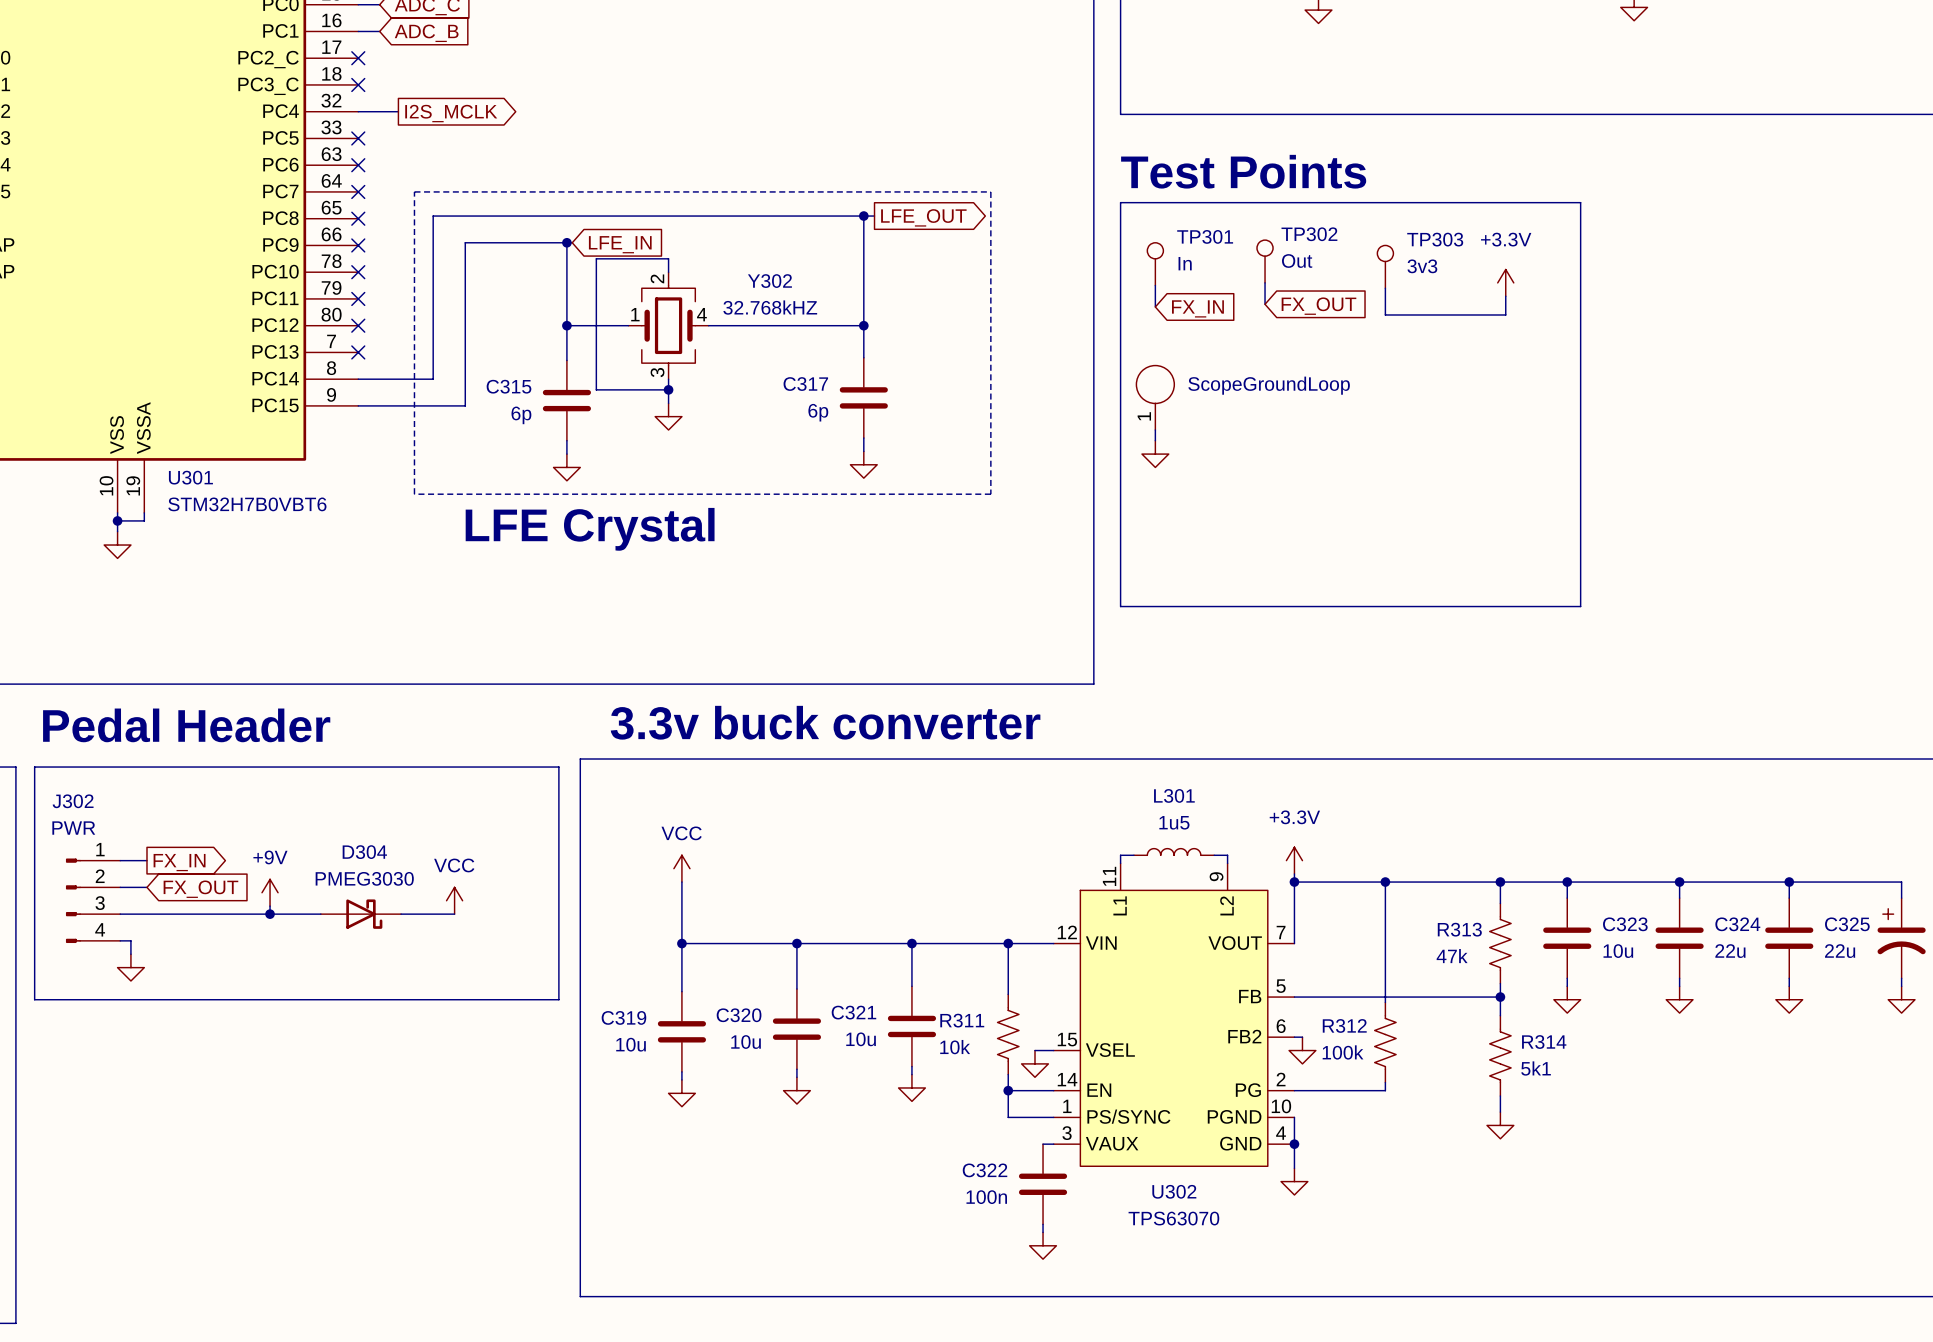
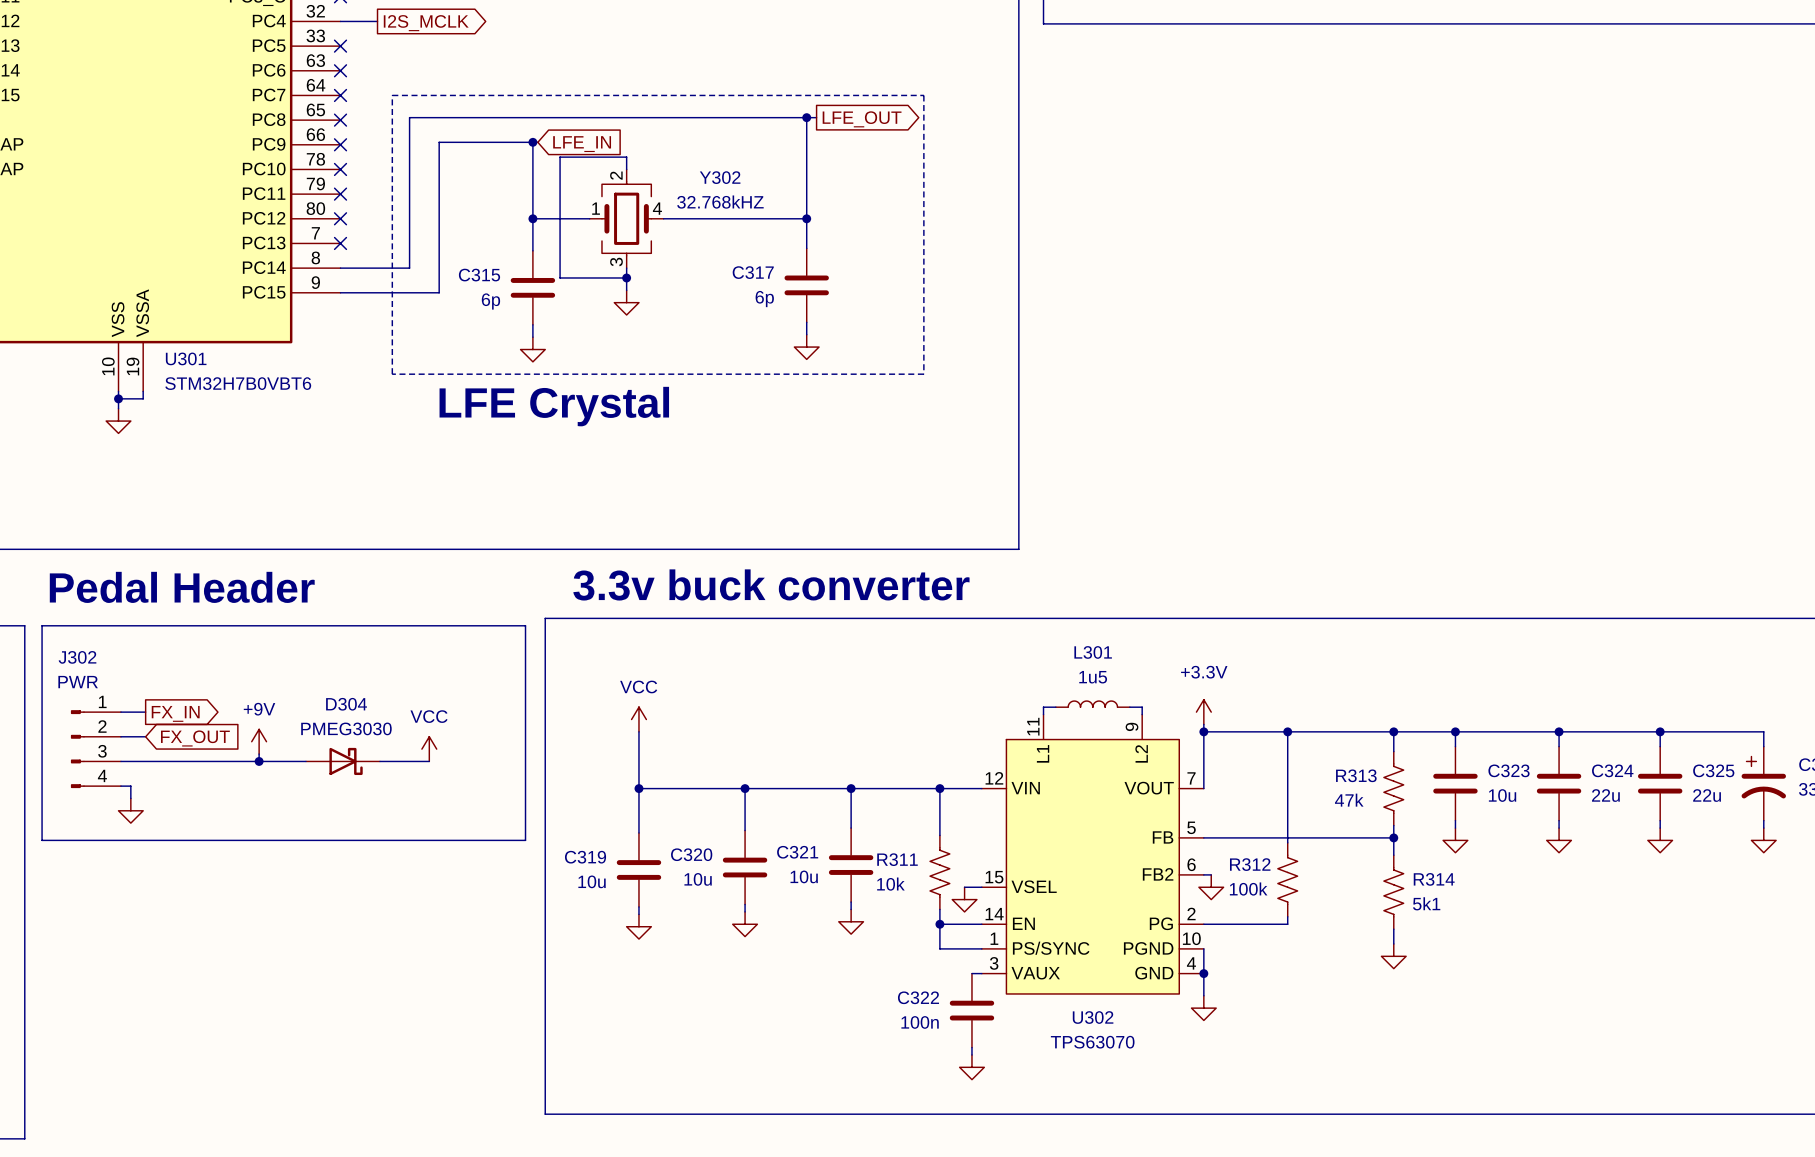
text: Test Points (1243, 171) -> none
line: (1120, 202) (1580, 202) (1580, 606) (1120, 606) (1120, 202) -> none
TP302: Out (1265, 261) -> none
TP301: In (1155, 264) -> none
TP303: 3v3 (1385, 266) -> none
wire: (1265, 282) (1265, 304) -> none
power symbol: +3.3V (1505, 282) -> none
wire: (1155, 285) (1155, 306) -> none
wire: (1385, 288) (1385, 314) (1505, 314) (1505, 296) -> none
global label: FX_OUT (1318, 306) -> none
global label: FX_IN (1197, 308) -> none
part: ScopeGroundLoop (1155, 397) -> none
wire: (1155, 430) (1155, 440) -> none
power symbol: (1155, 454) -> none

